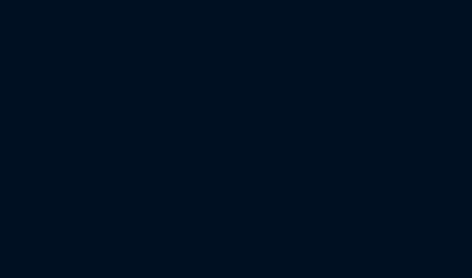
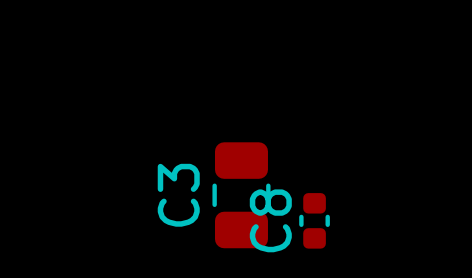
C3: none -> (241, 195)
C8: none -> (314, 220)

